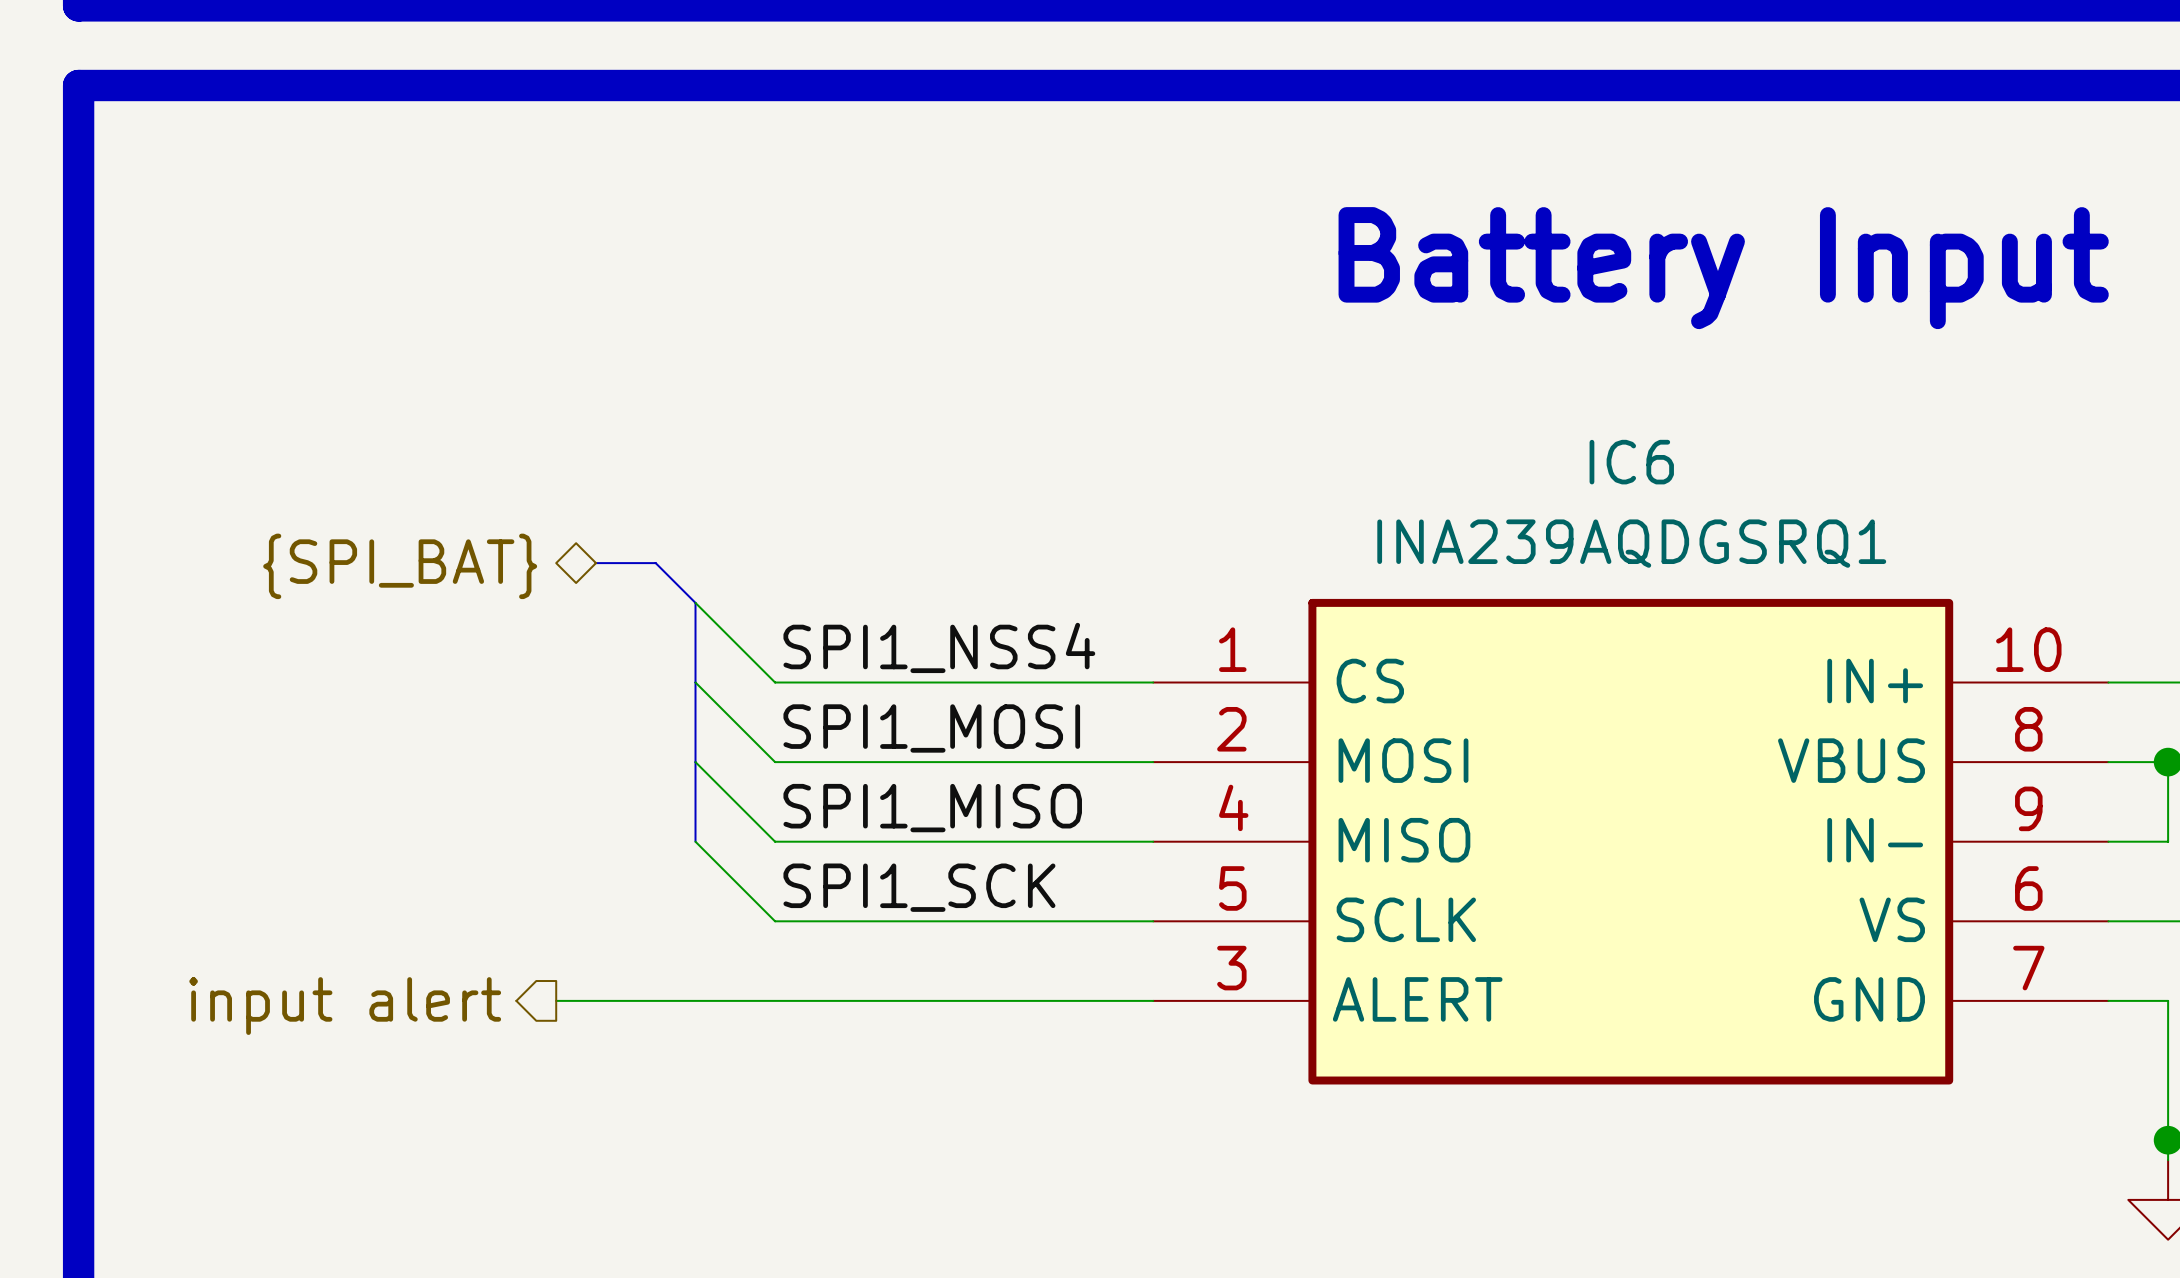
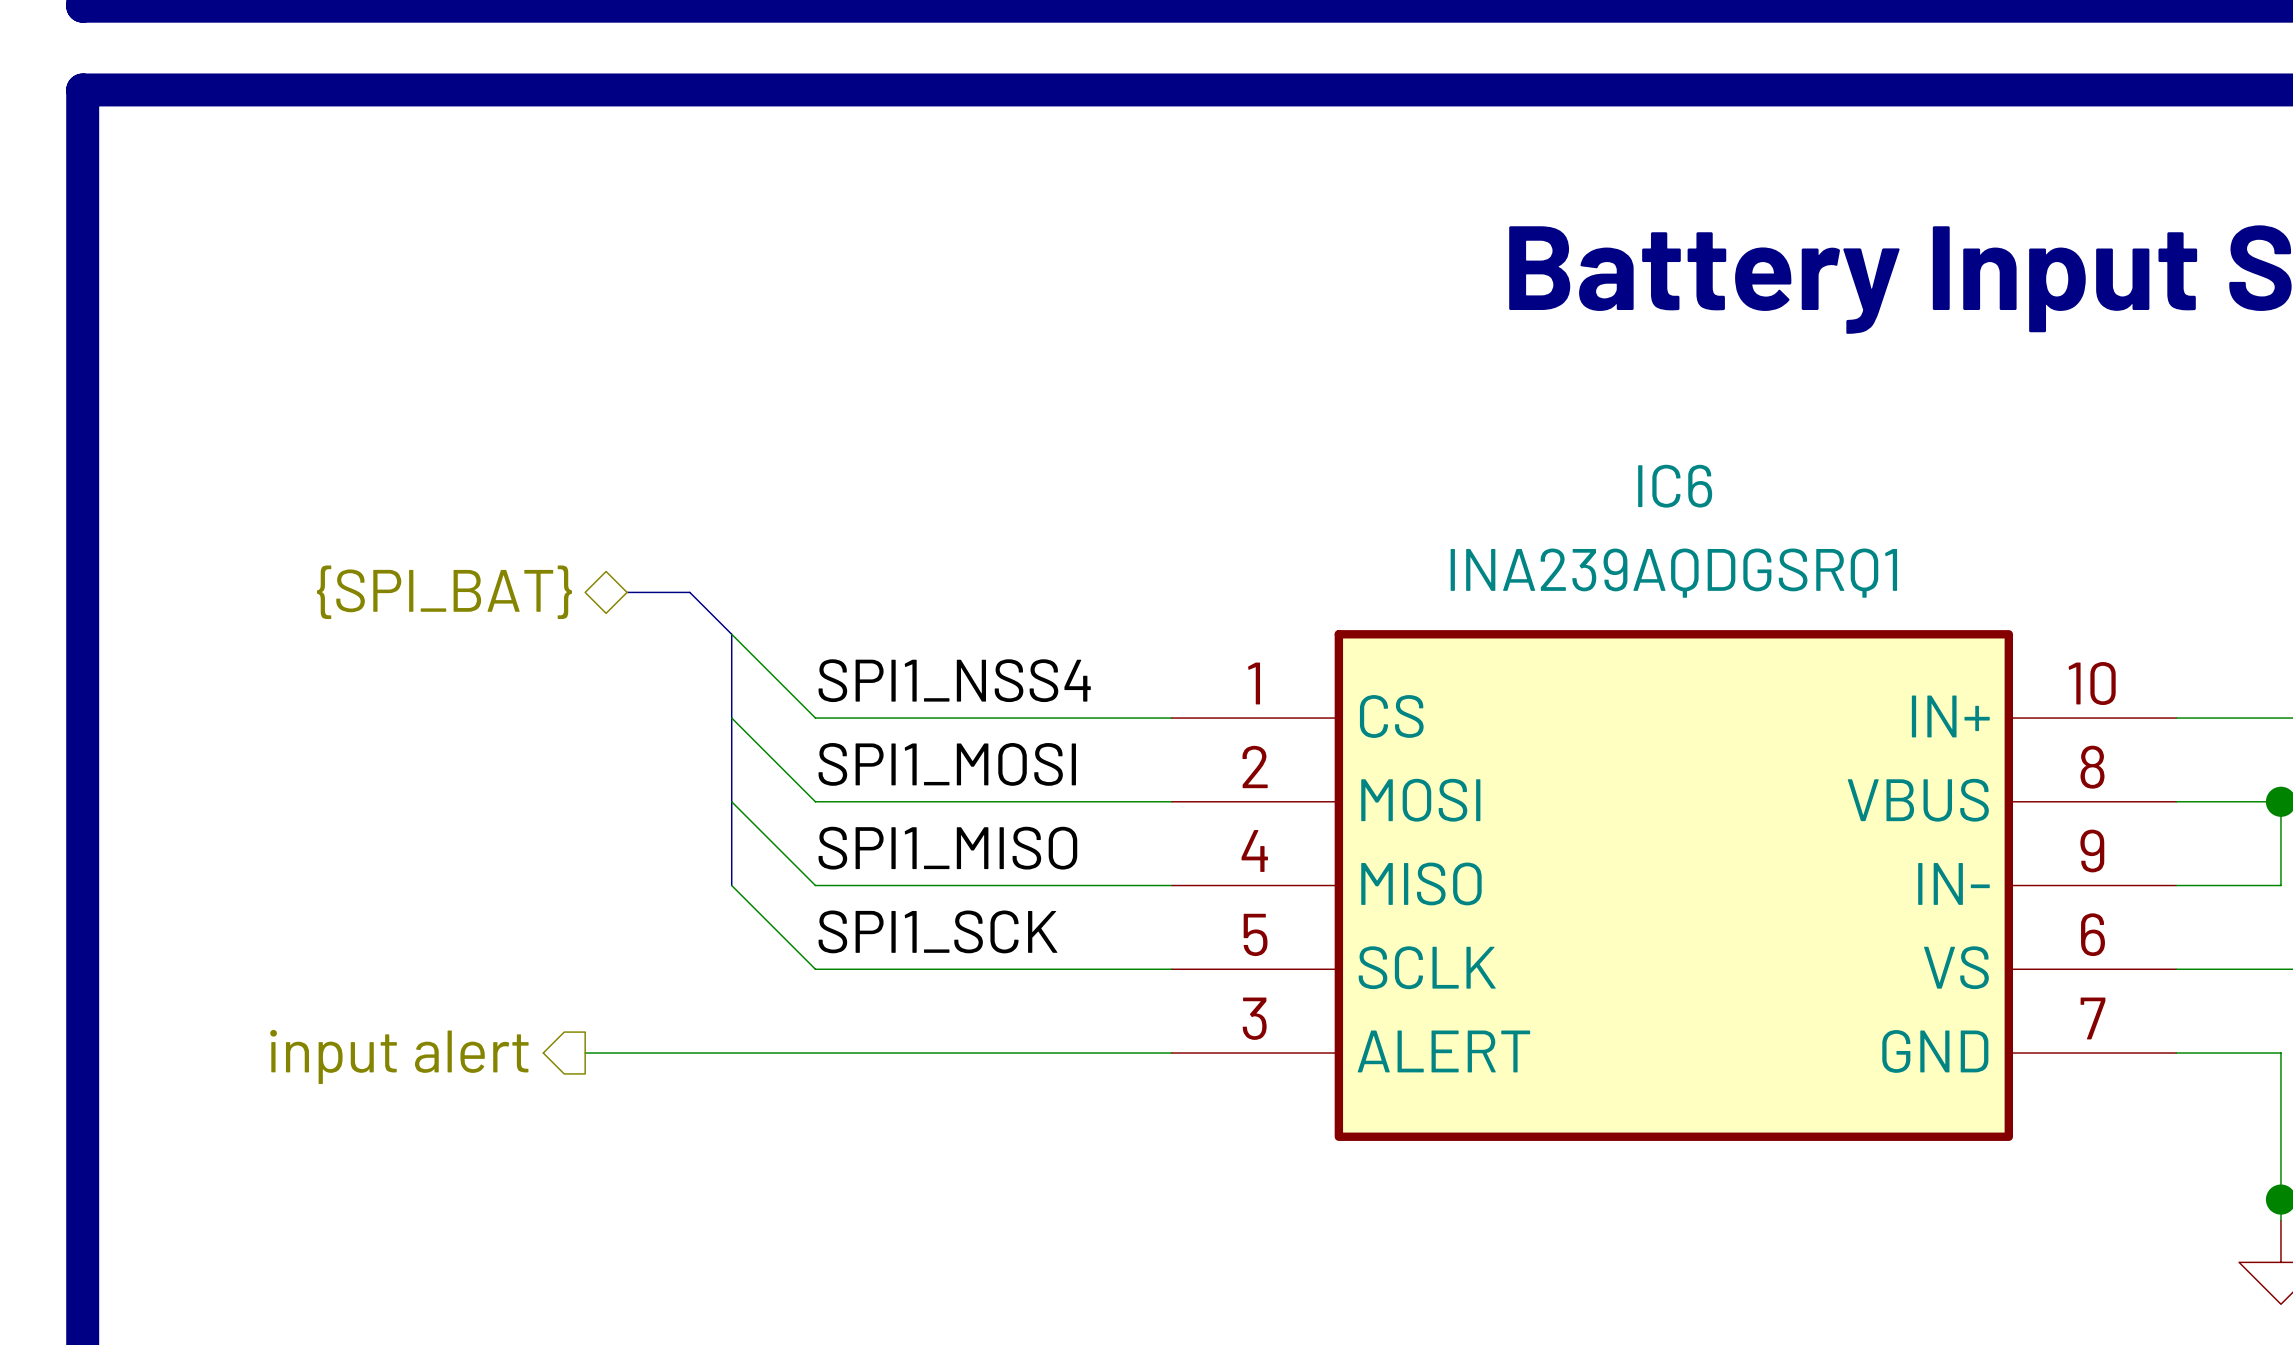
IC6 position: (1630, 841) -> (1673, 885)

